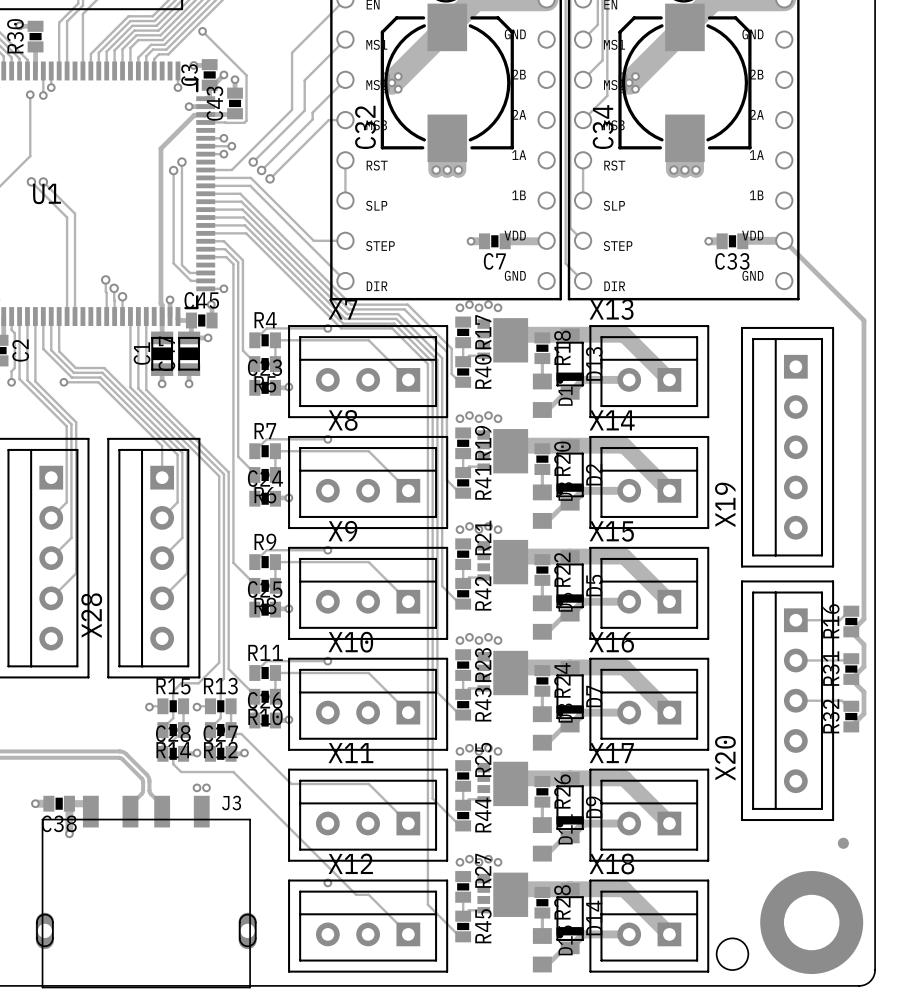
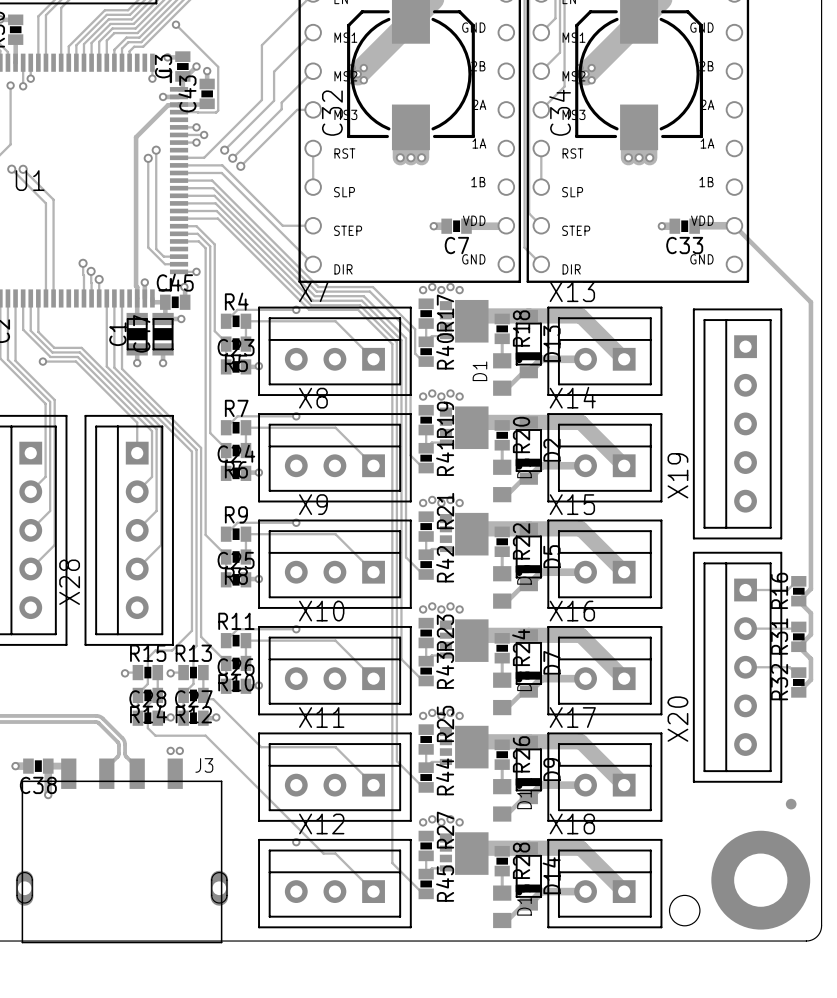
D1 name position: D1 (565, 396) -> D1 (479, 371)

